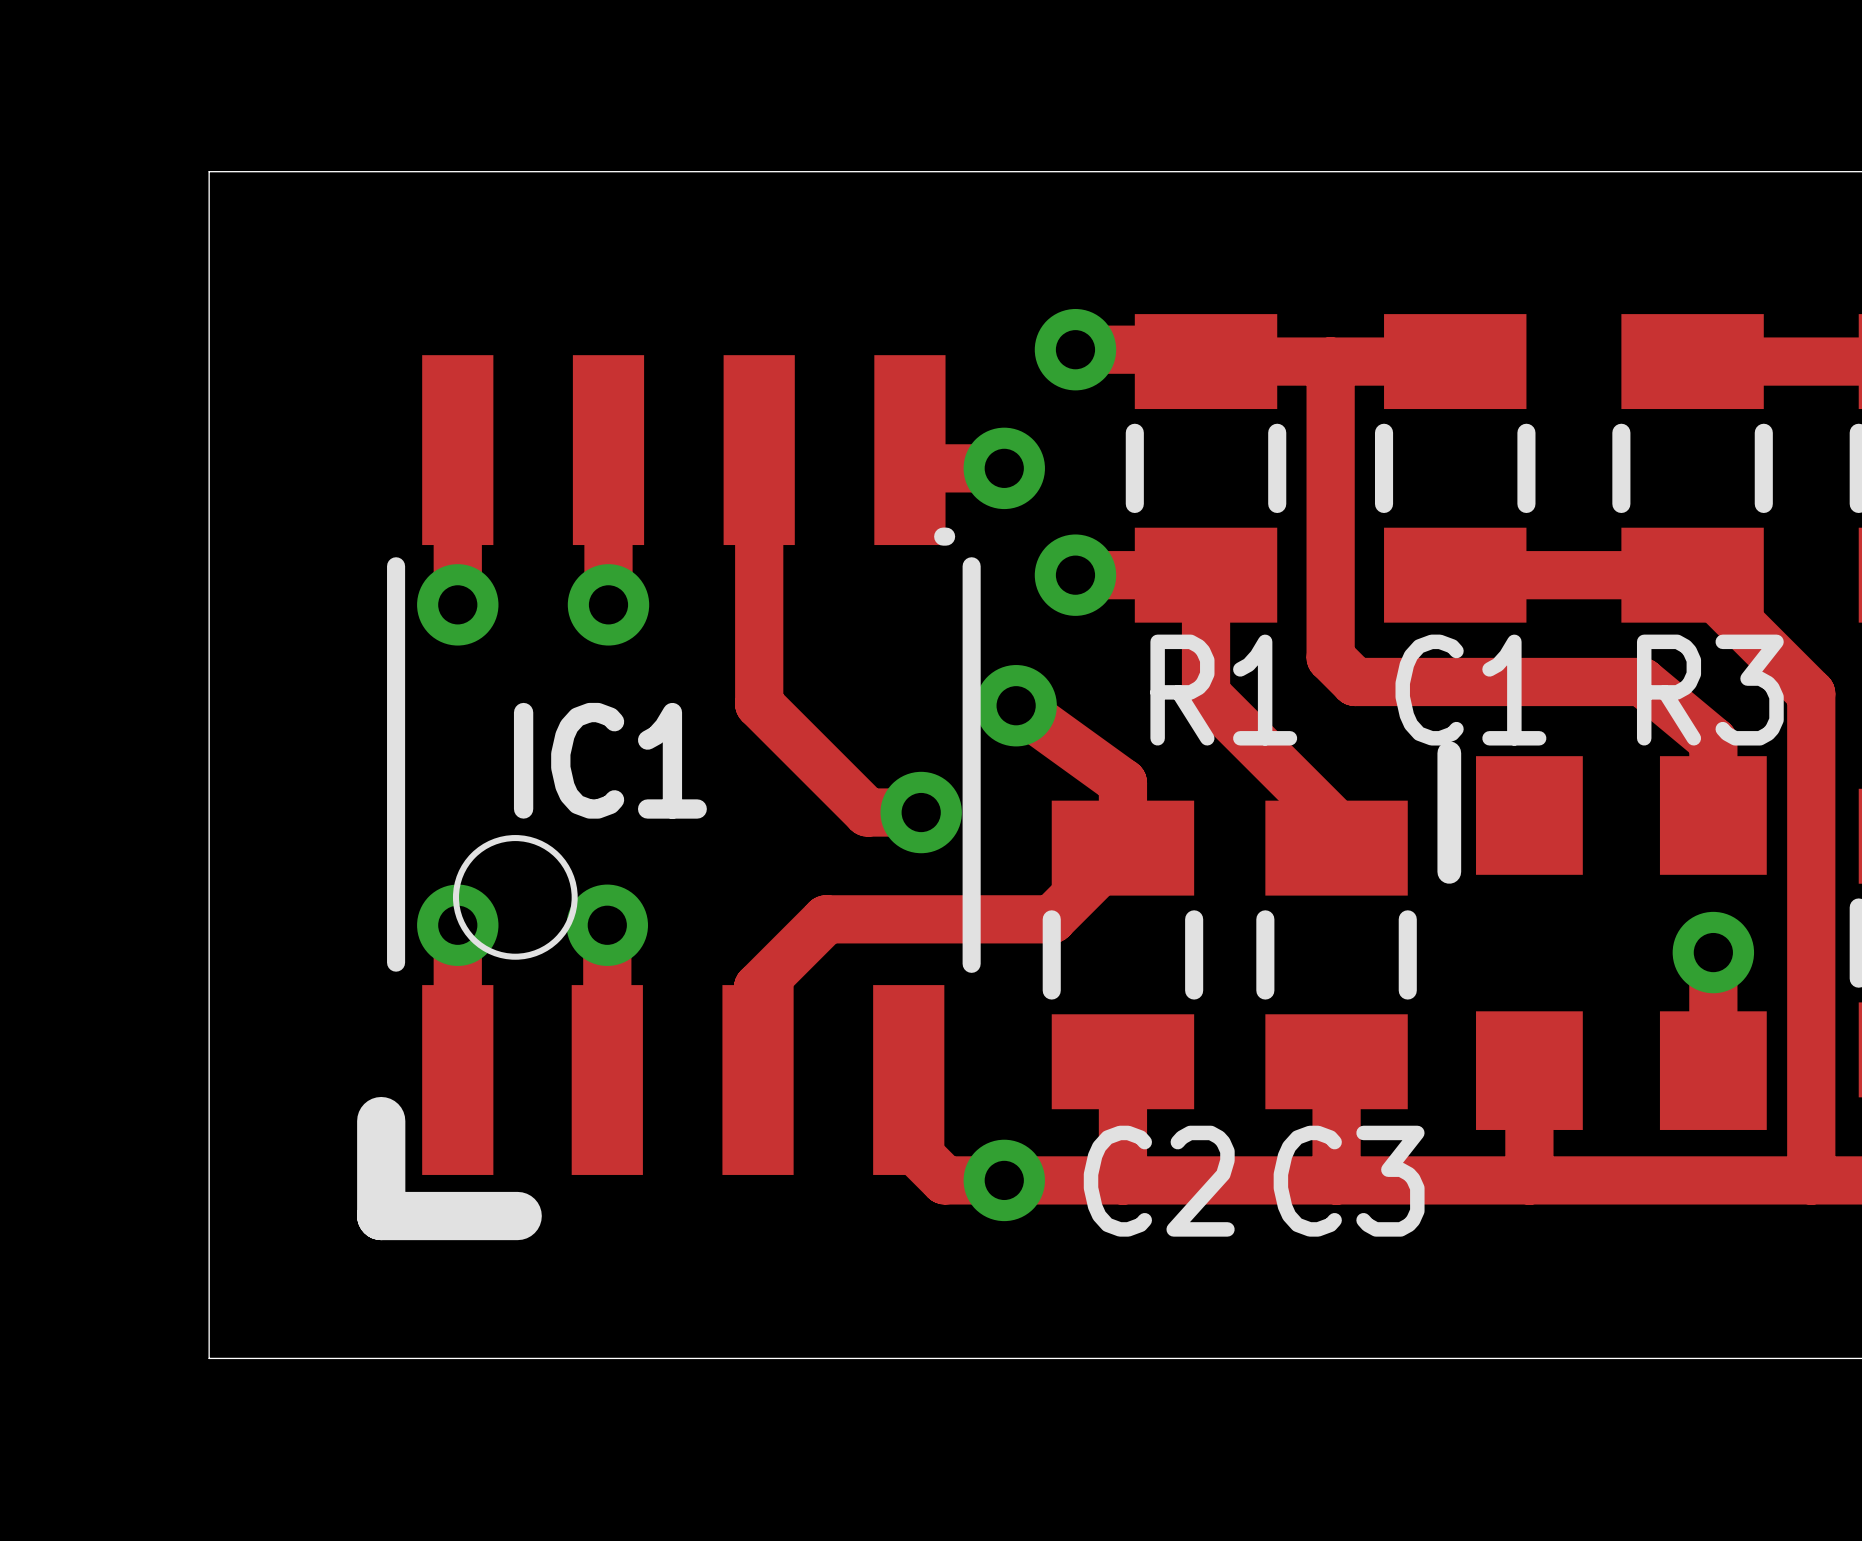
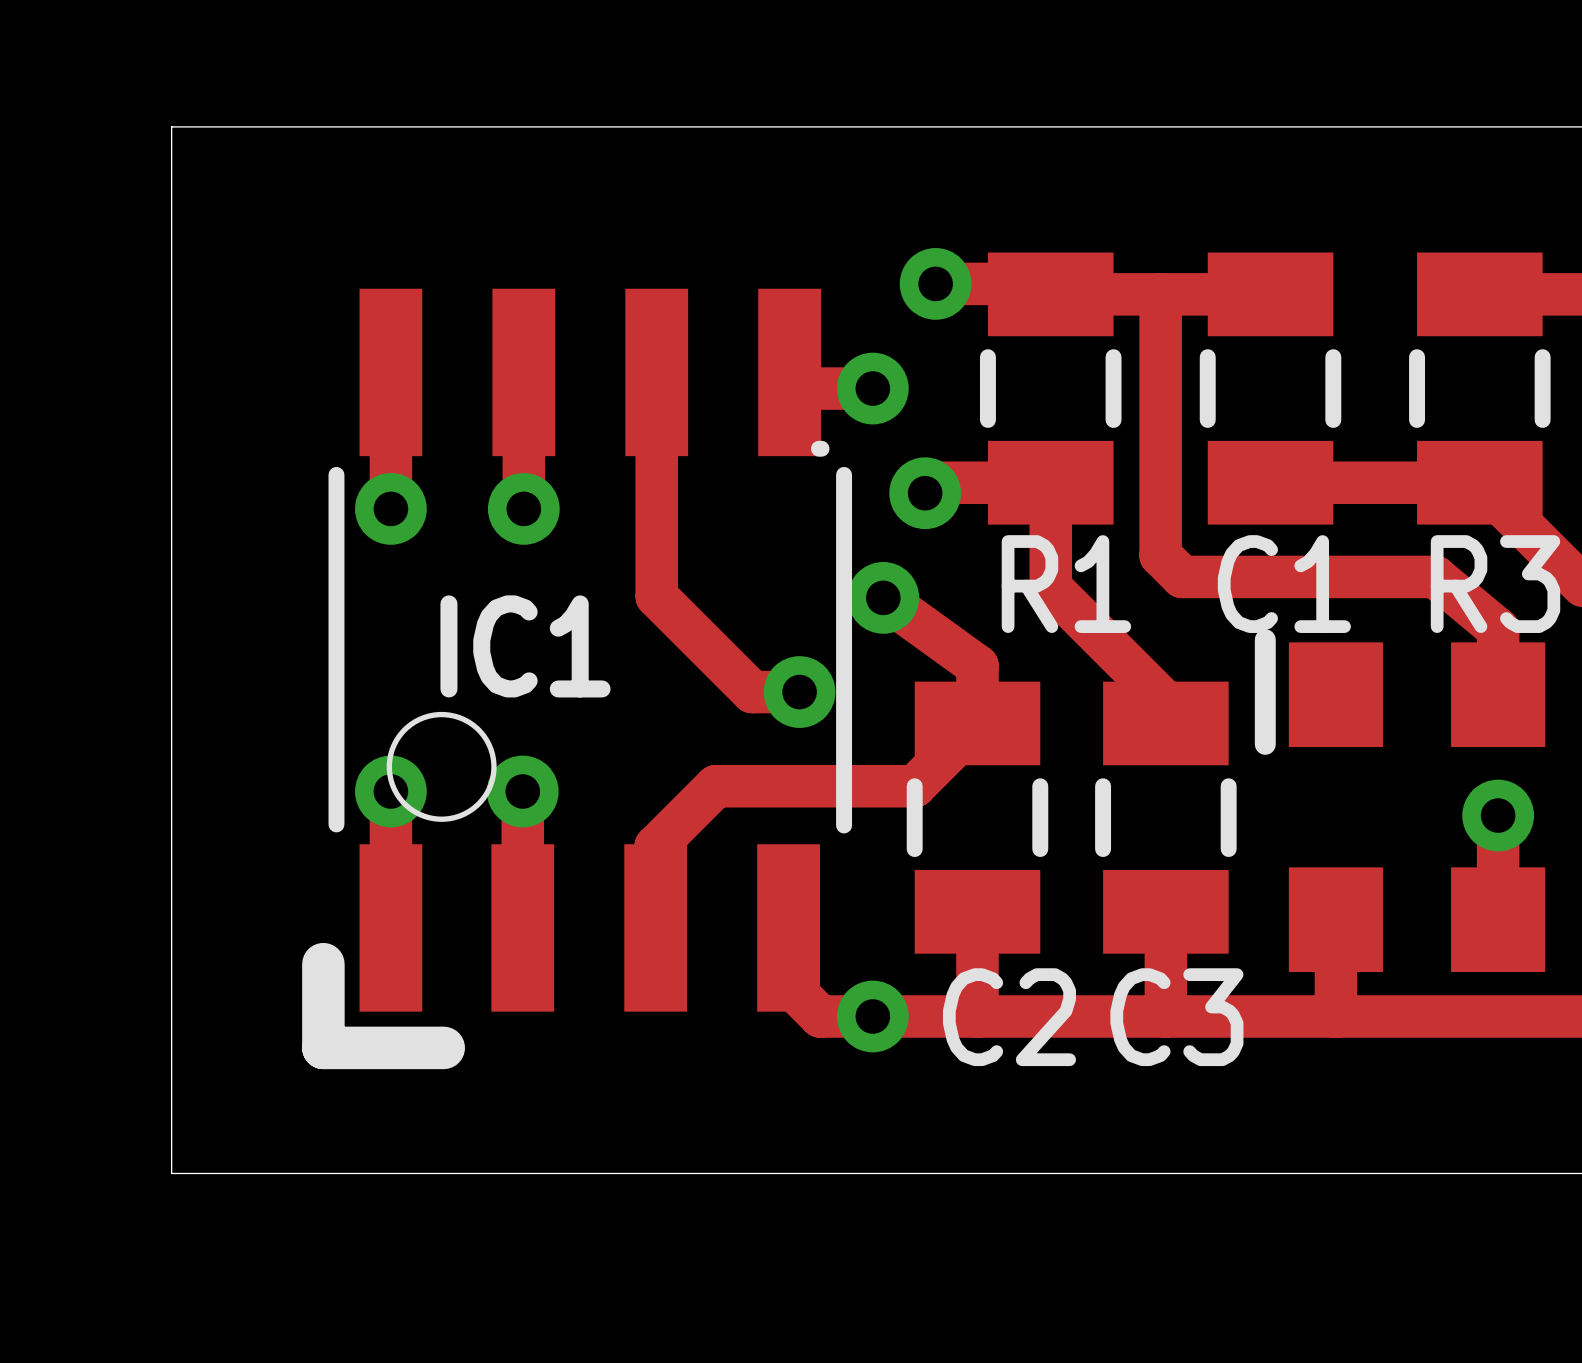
via position: (1075, 575) -> (925, 493)

